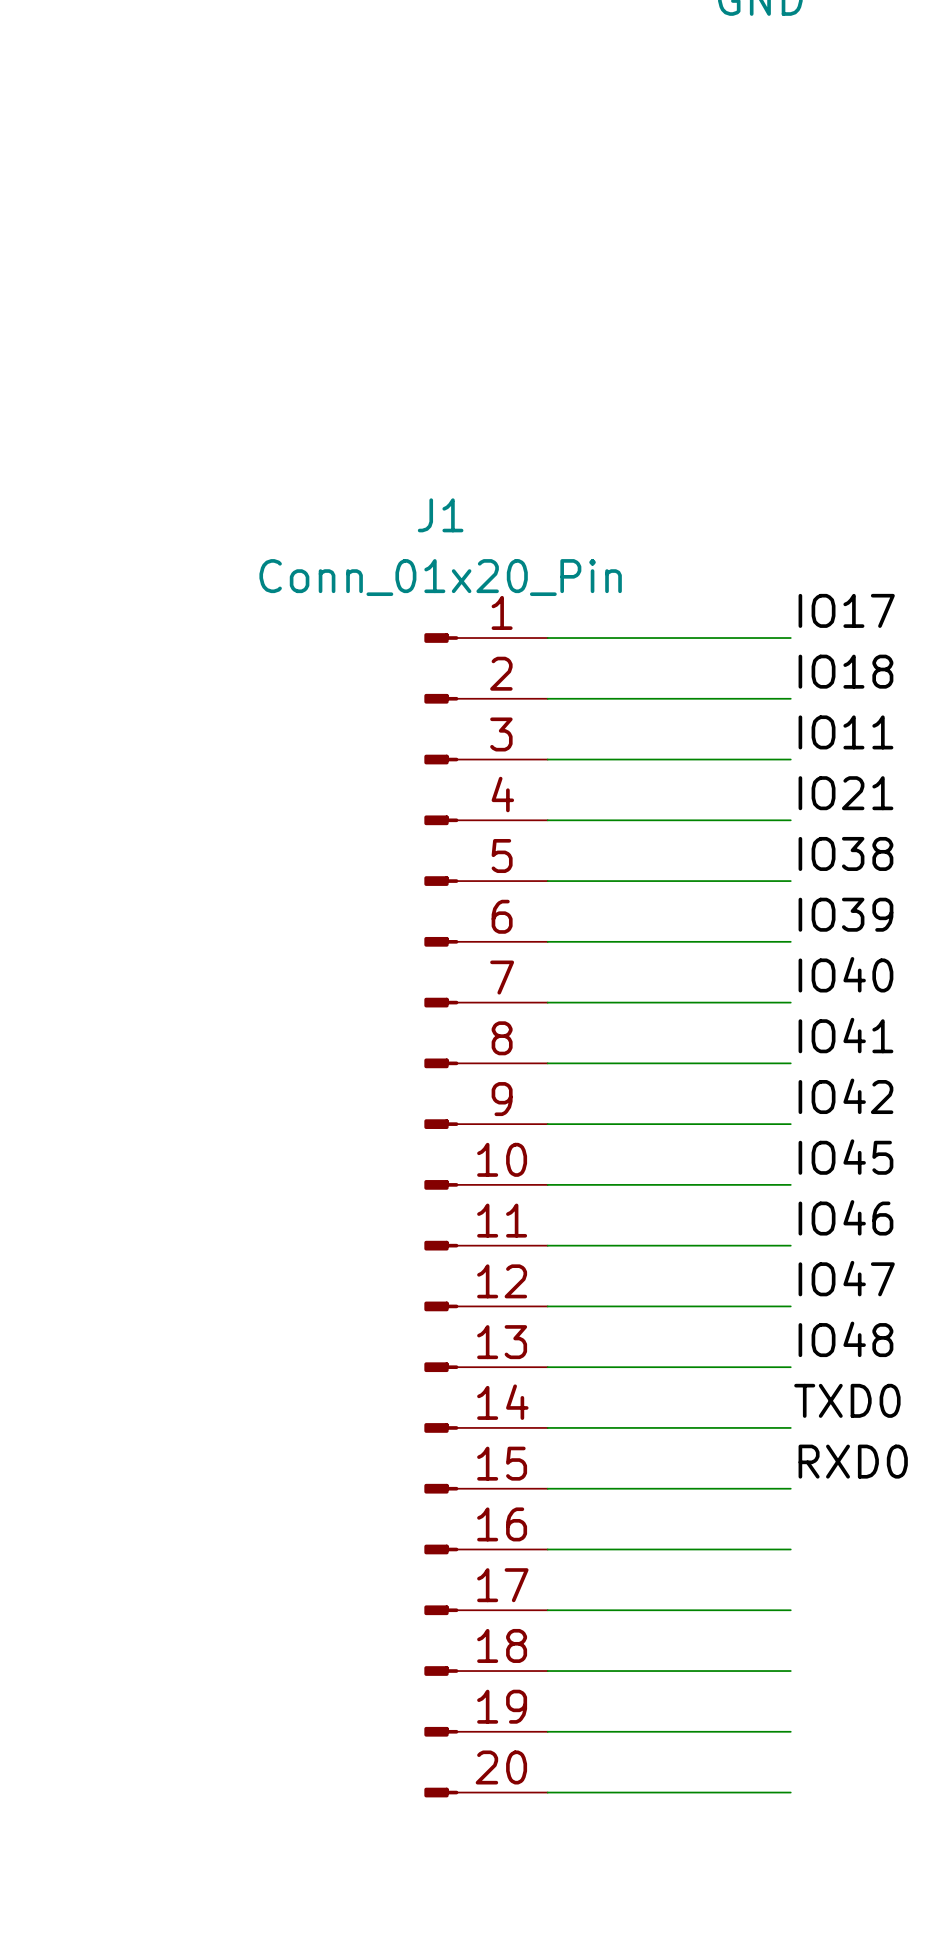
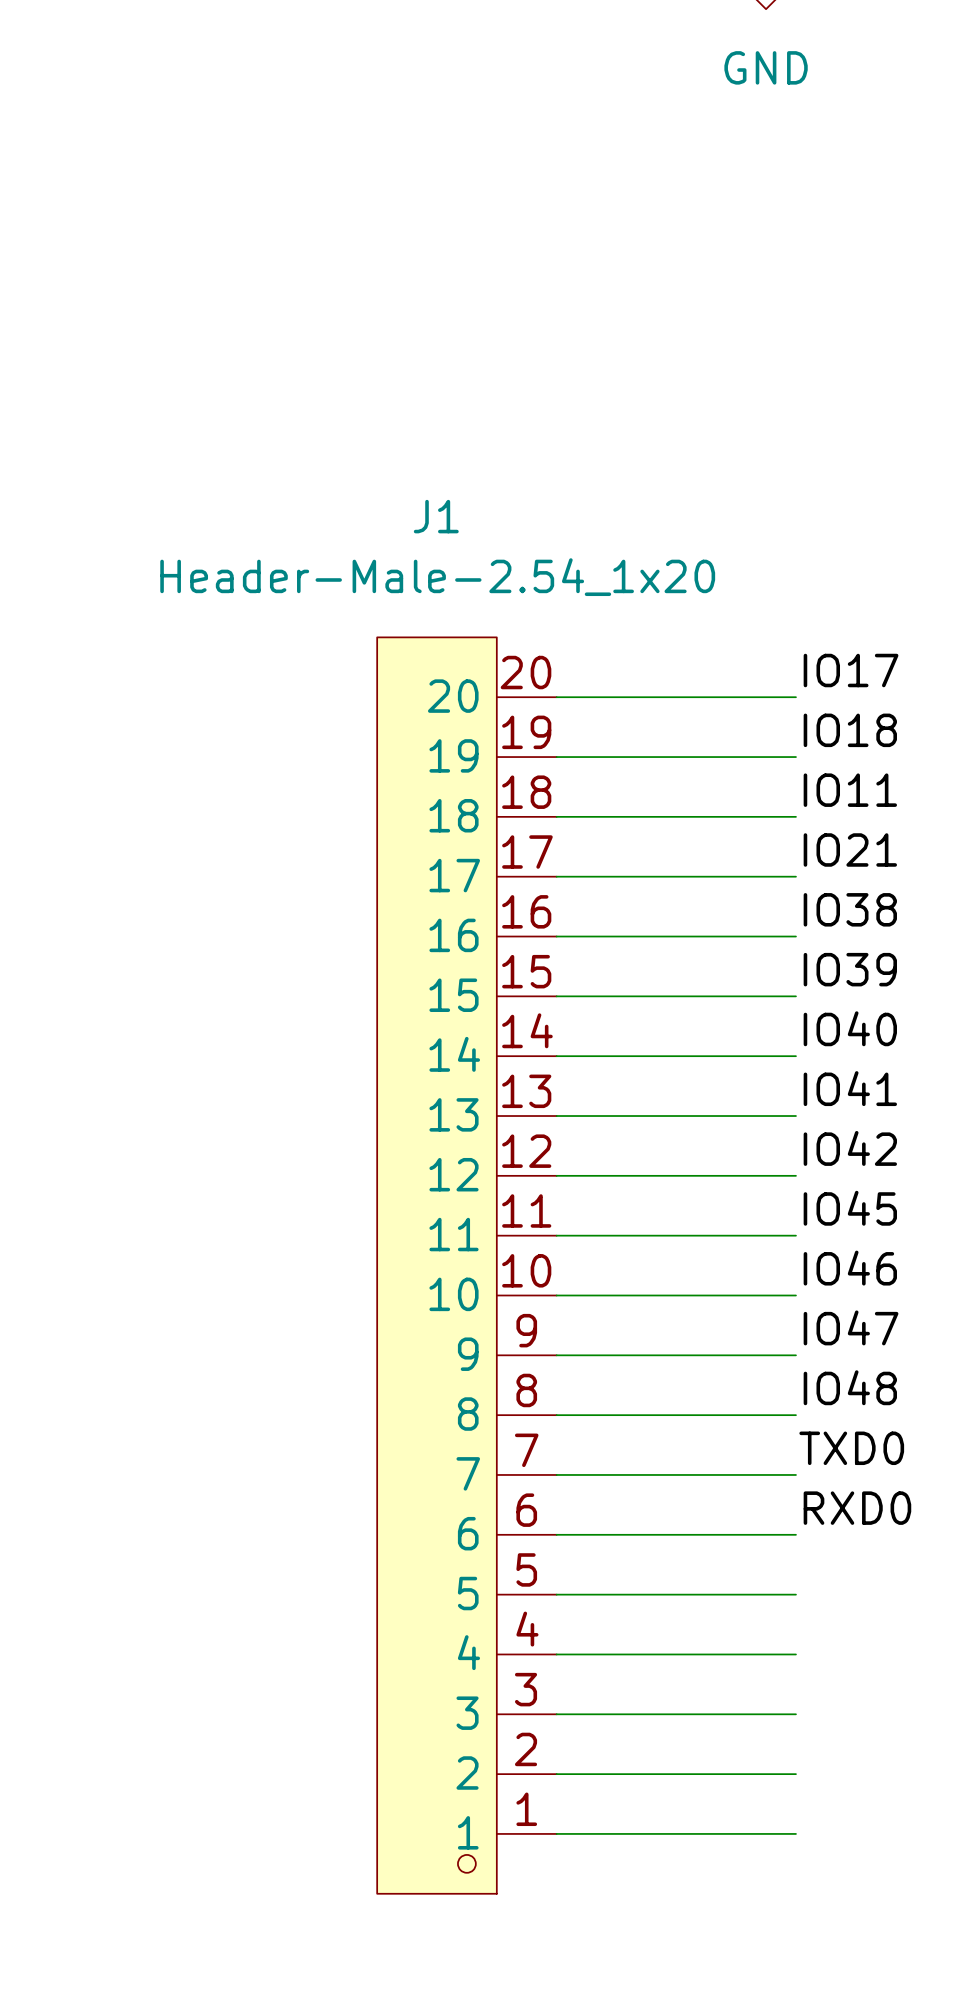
J1 name position: J1 (440, 515) -> J1 (436, 516)
J1 value: Conn_01x20_Pin (440, 577) -> Header-Male-2.54_1x20 (437, 577)
J1 symbol: [424, 633, 548, 1798] -> [377, 637, 557, 1894]

